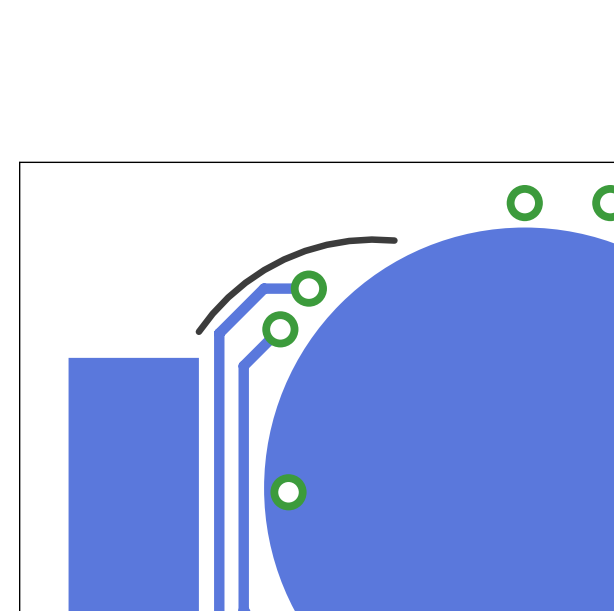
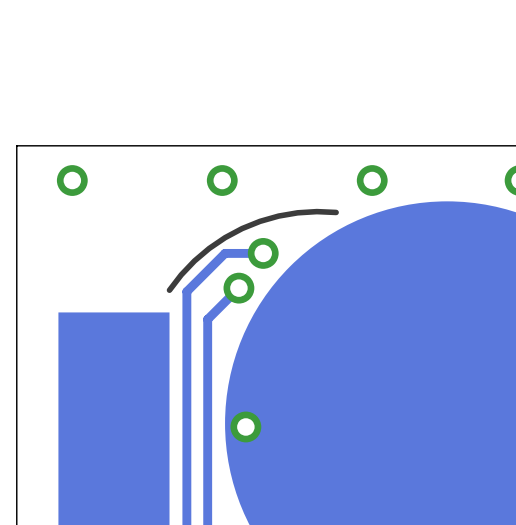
via: none -> (72, 180)
via: none -> (222, 180)
via position: (524, 203) -> (372, 180)

